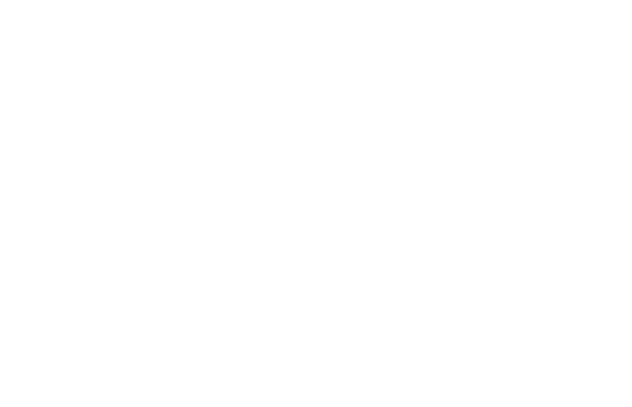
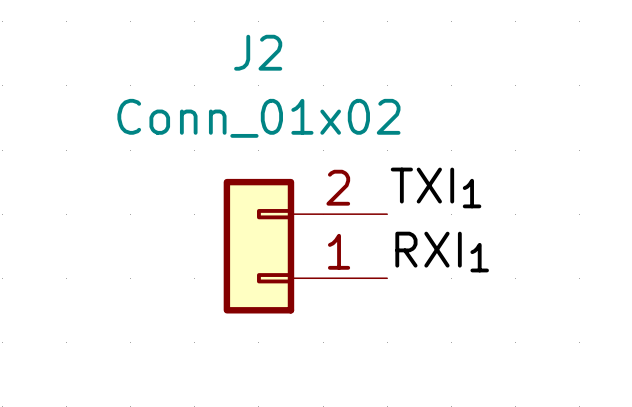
label: none -> TXI1 (436, 187)
J2: none -> Conn_01x02 (305, 246)
label: none -> RXI1 (442, 252)

